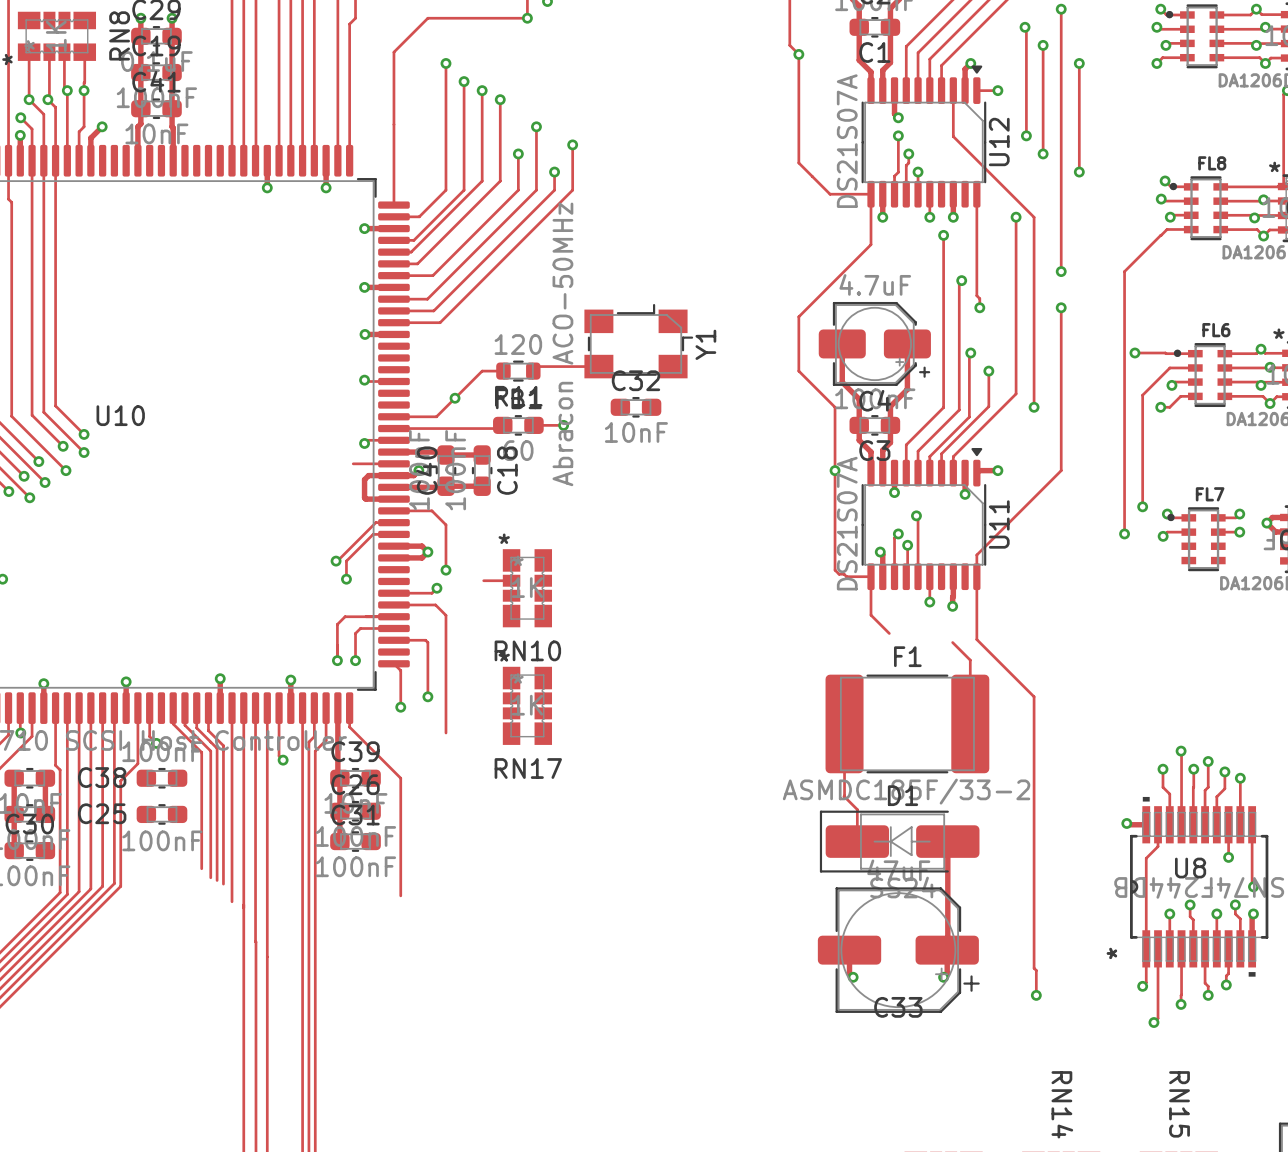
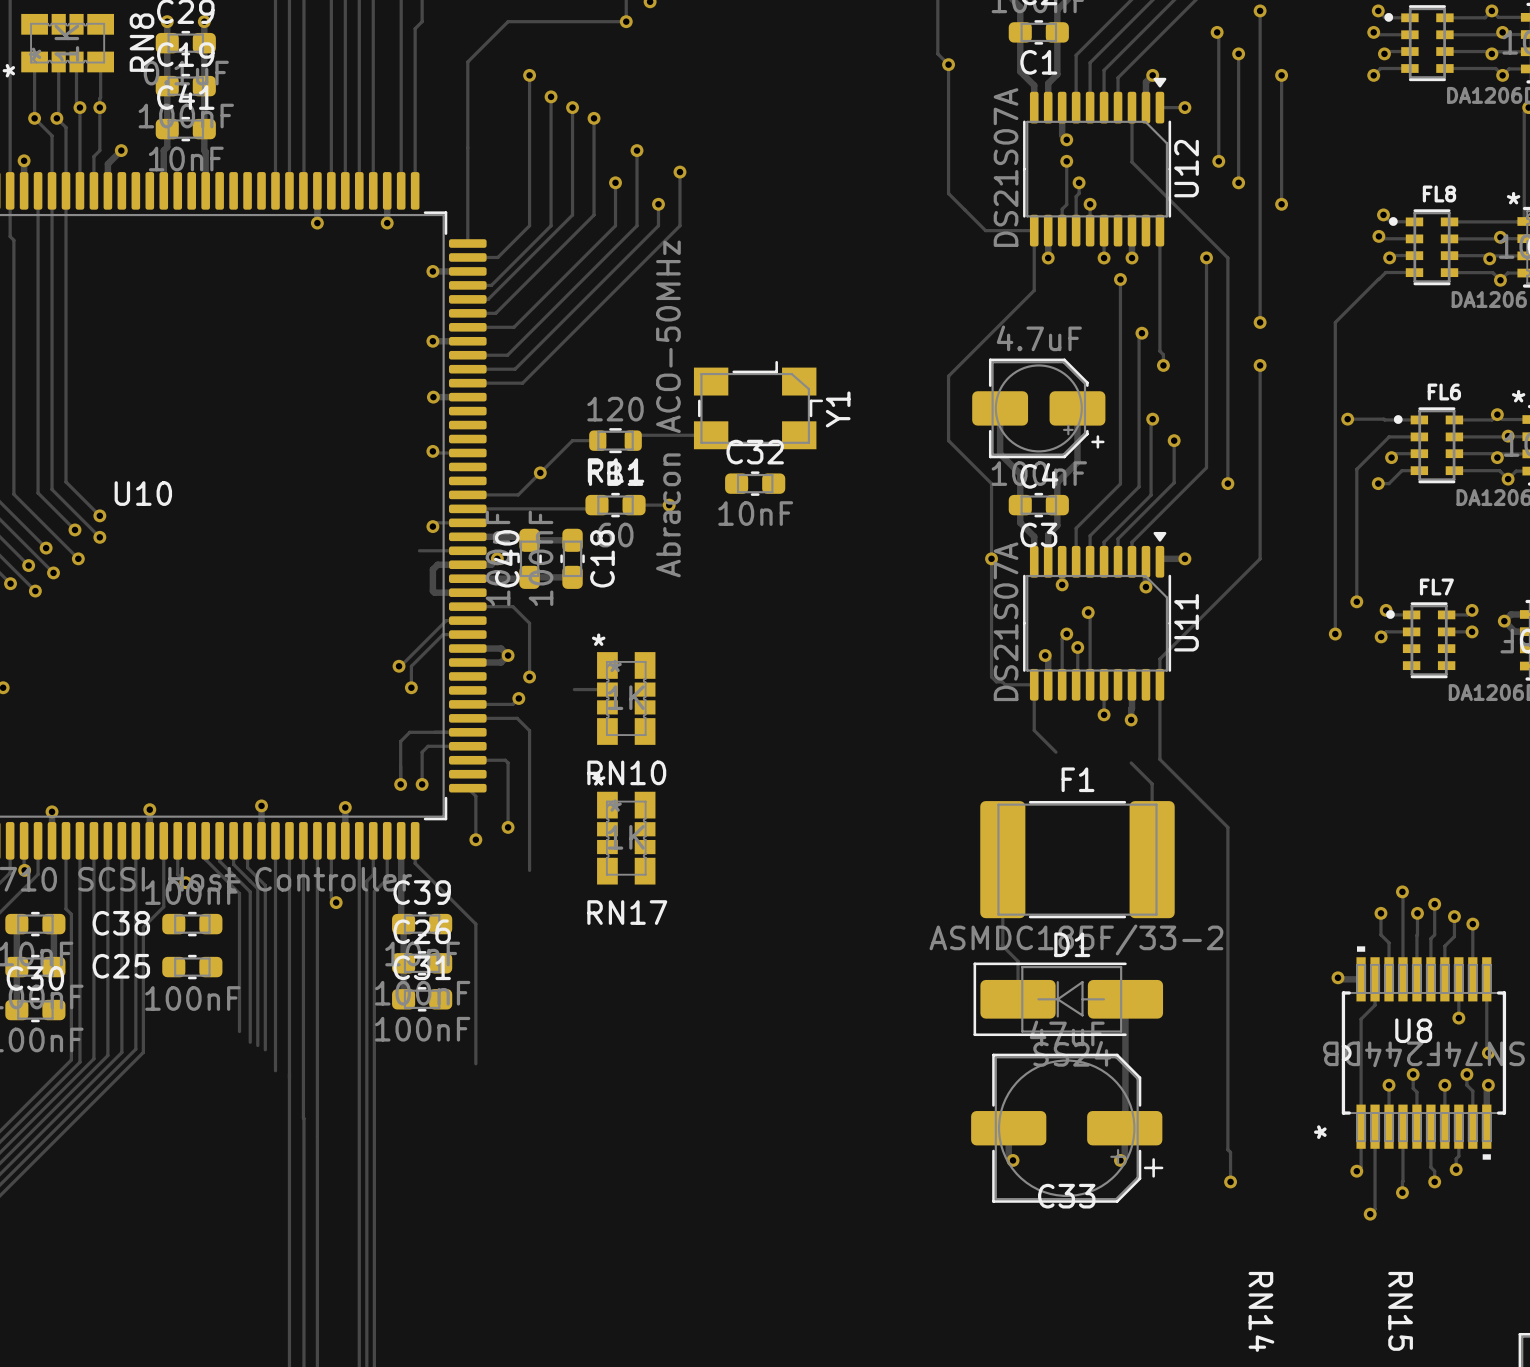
track: (20, 117) (32, 129) (32, 160) -> none
via: (20, 117) -> none

